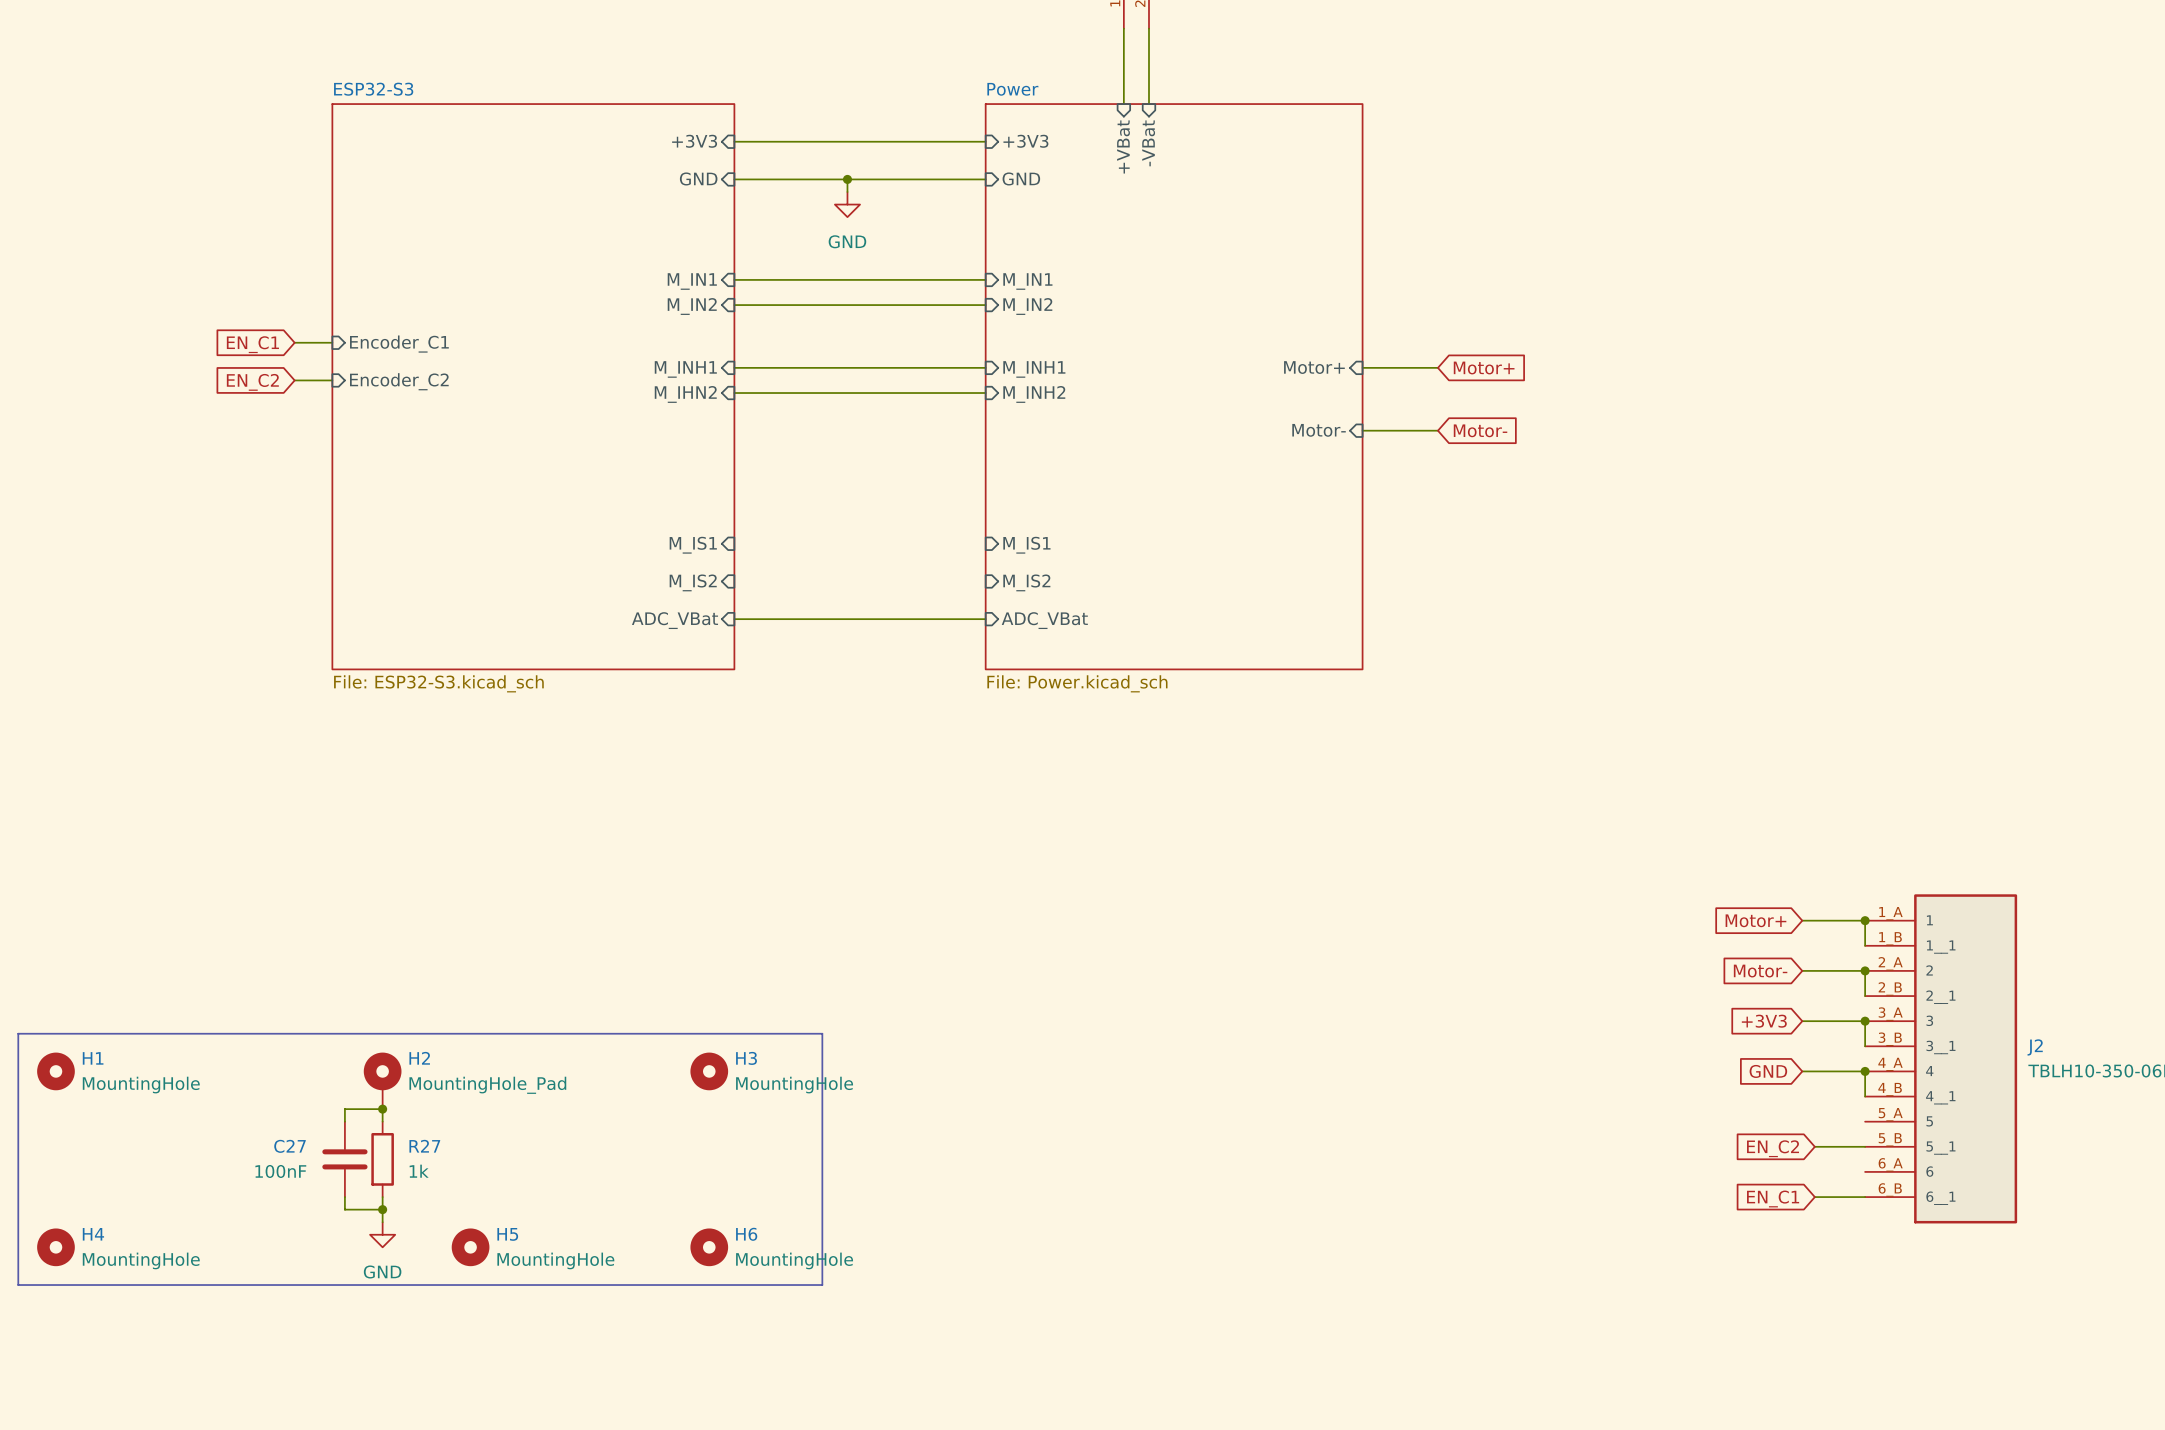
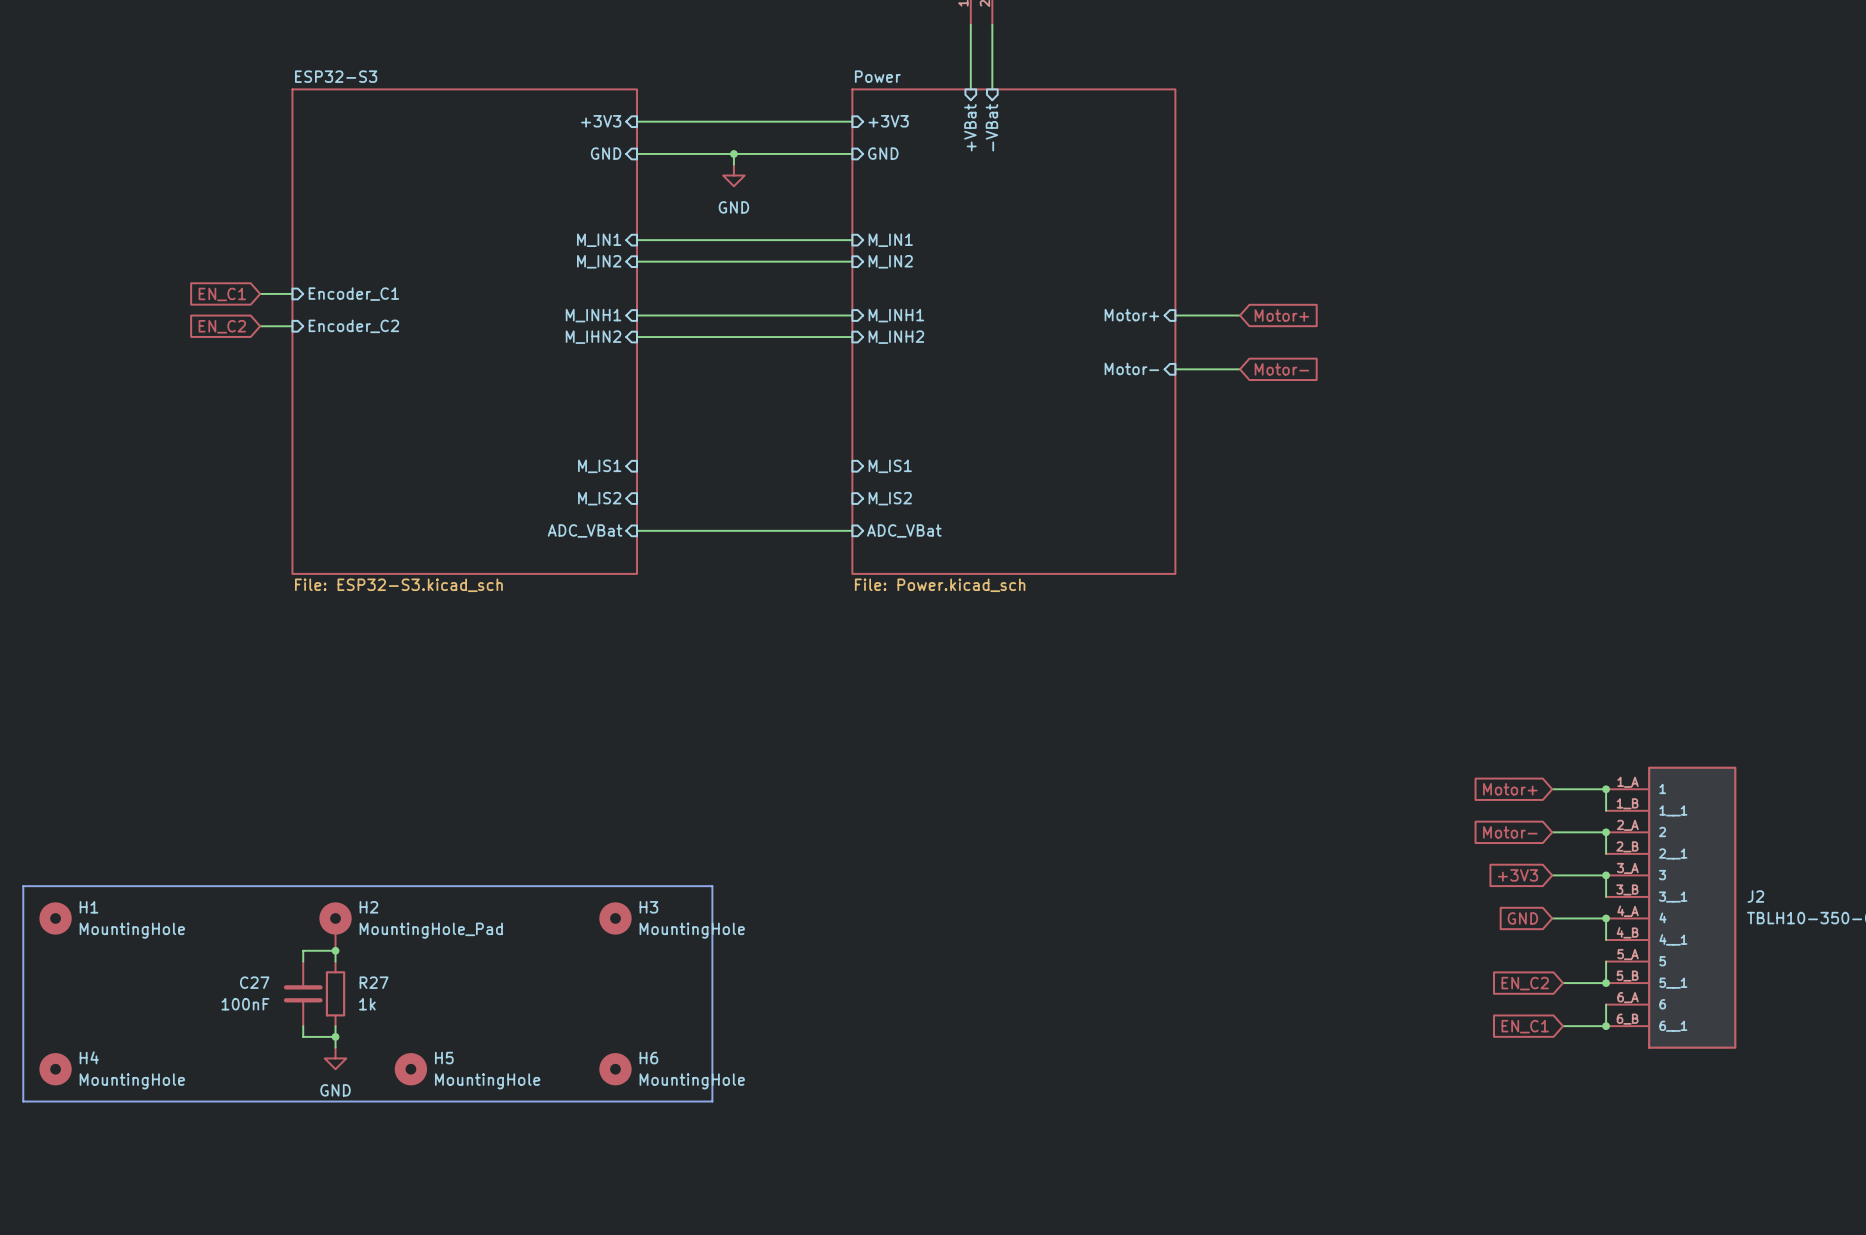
wire: none -> (1606, 961) (1606, 983)
junction: none -> (1606, 983)
wire: none -> (1606, 1004) (1606, 1026)
junction: none -> (1606, 1026)

